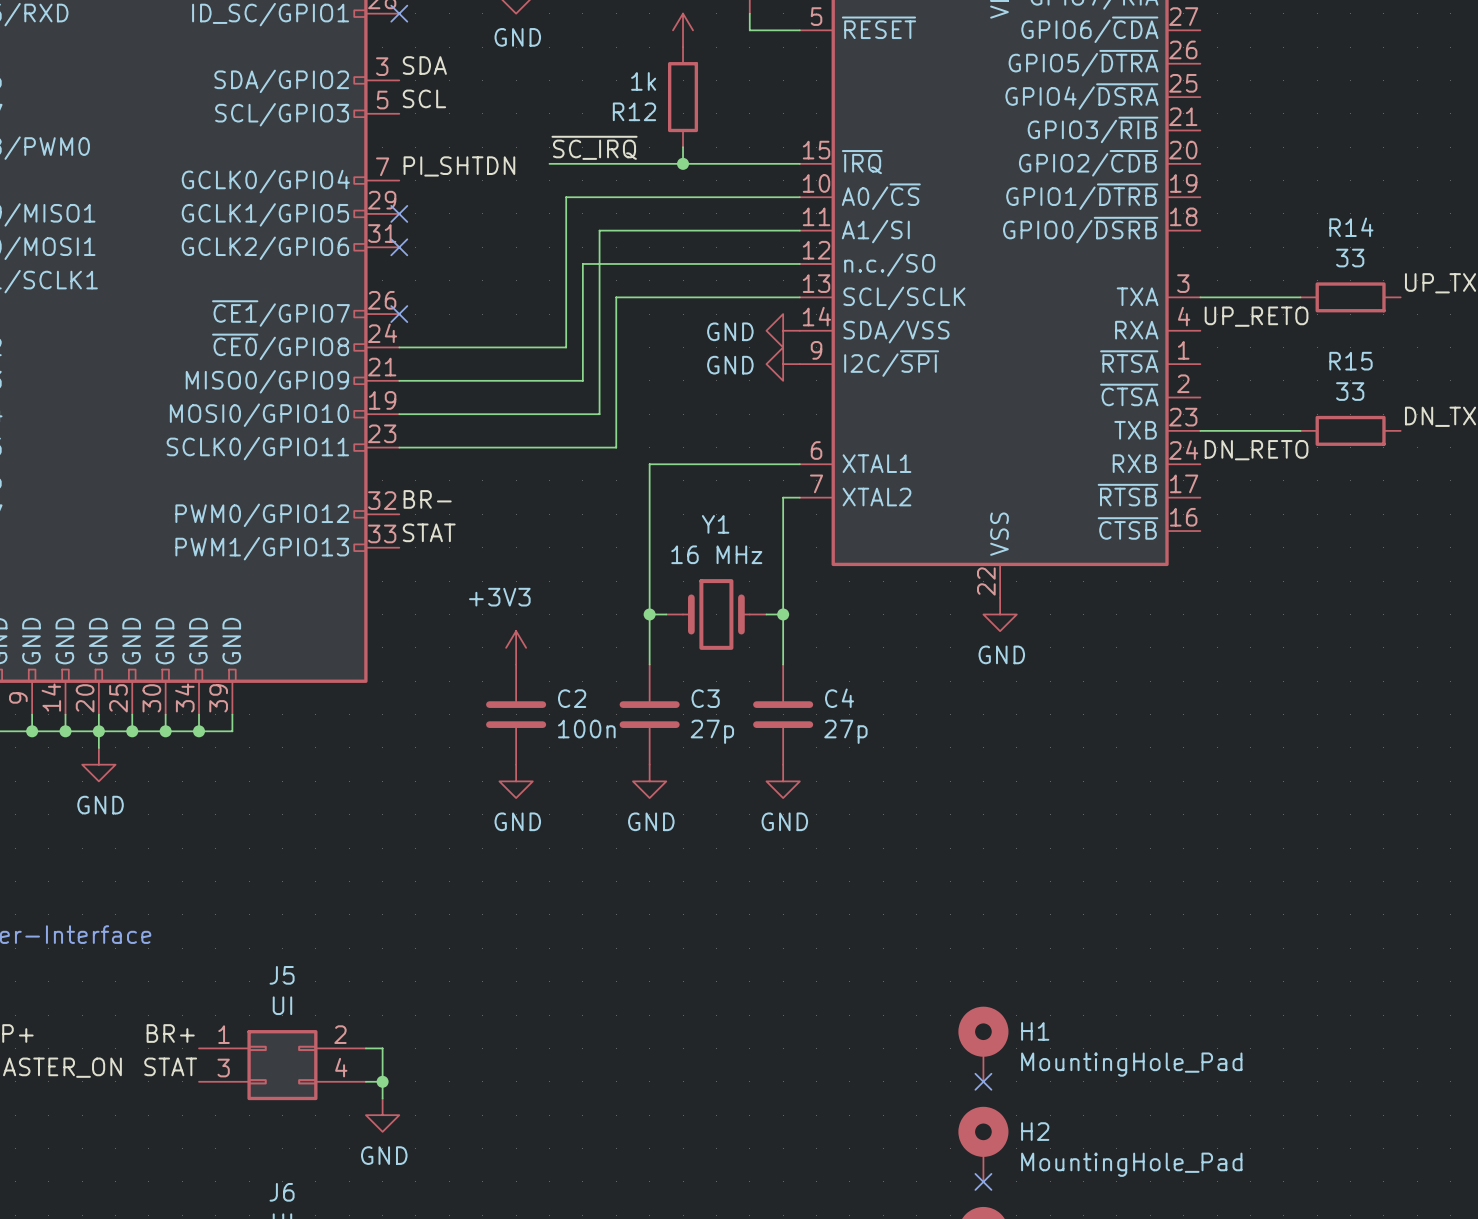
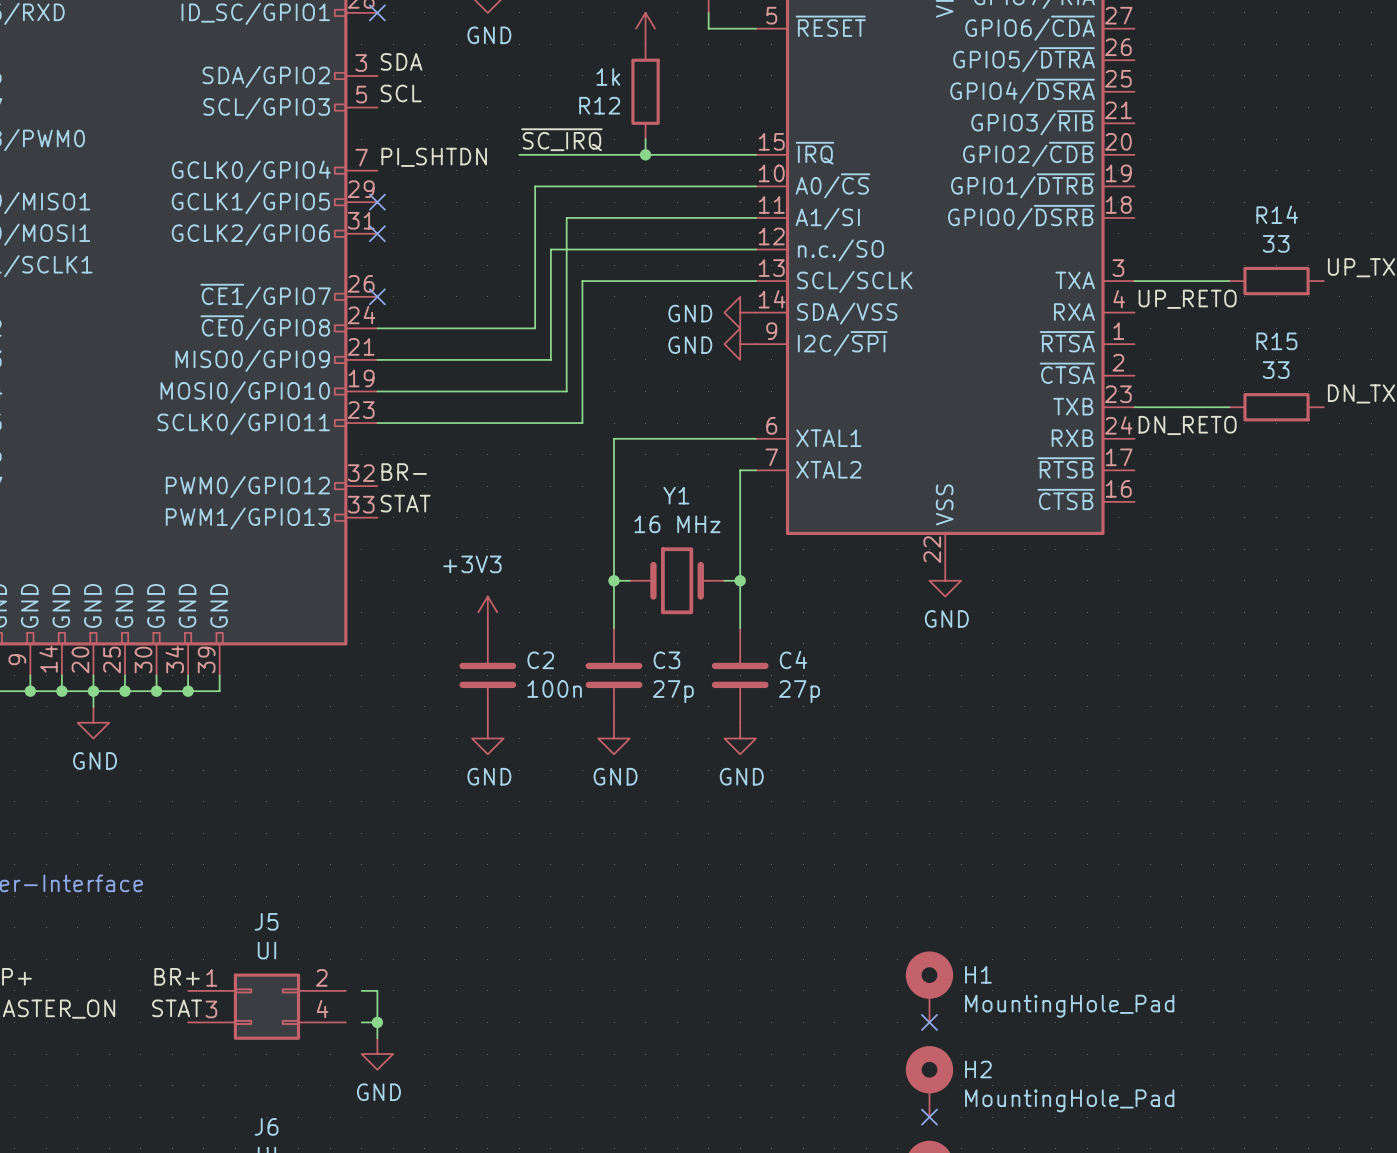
label position: BR+ (170, 1033) -> BR+ (177, 976)
wire: (365, 1048) (382, 1048) (382, 1098) -> (361, 990) (377, 990) (377, 1038)
label position: STAT (170, 1066) -> STAT (177, 1008)
wire: (365, 1081) (382, 1081) -> (377, 1022) (361, 1022)
junction position: (382, 1081) -> (377, 1022)
power symbol position: GND (382, 1115) -> GND (377, 1054)

